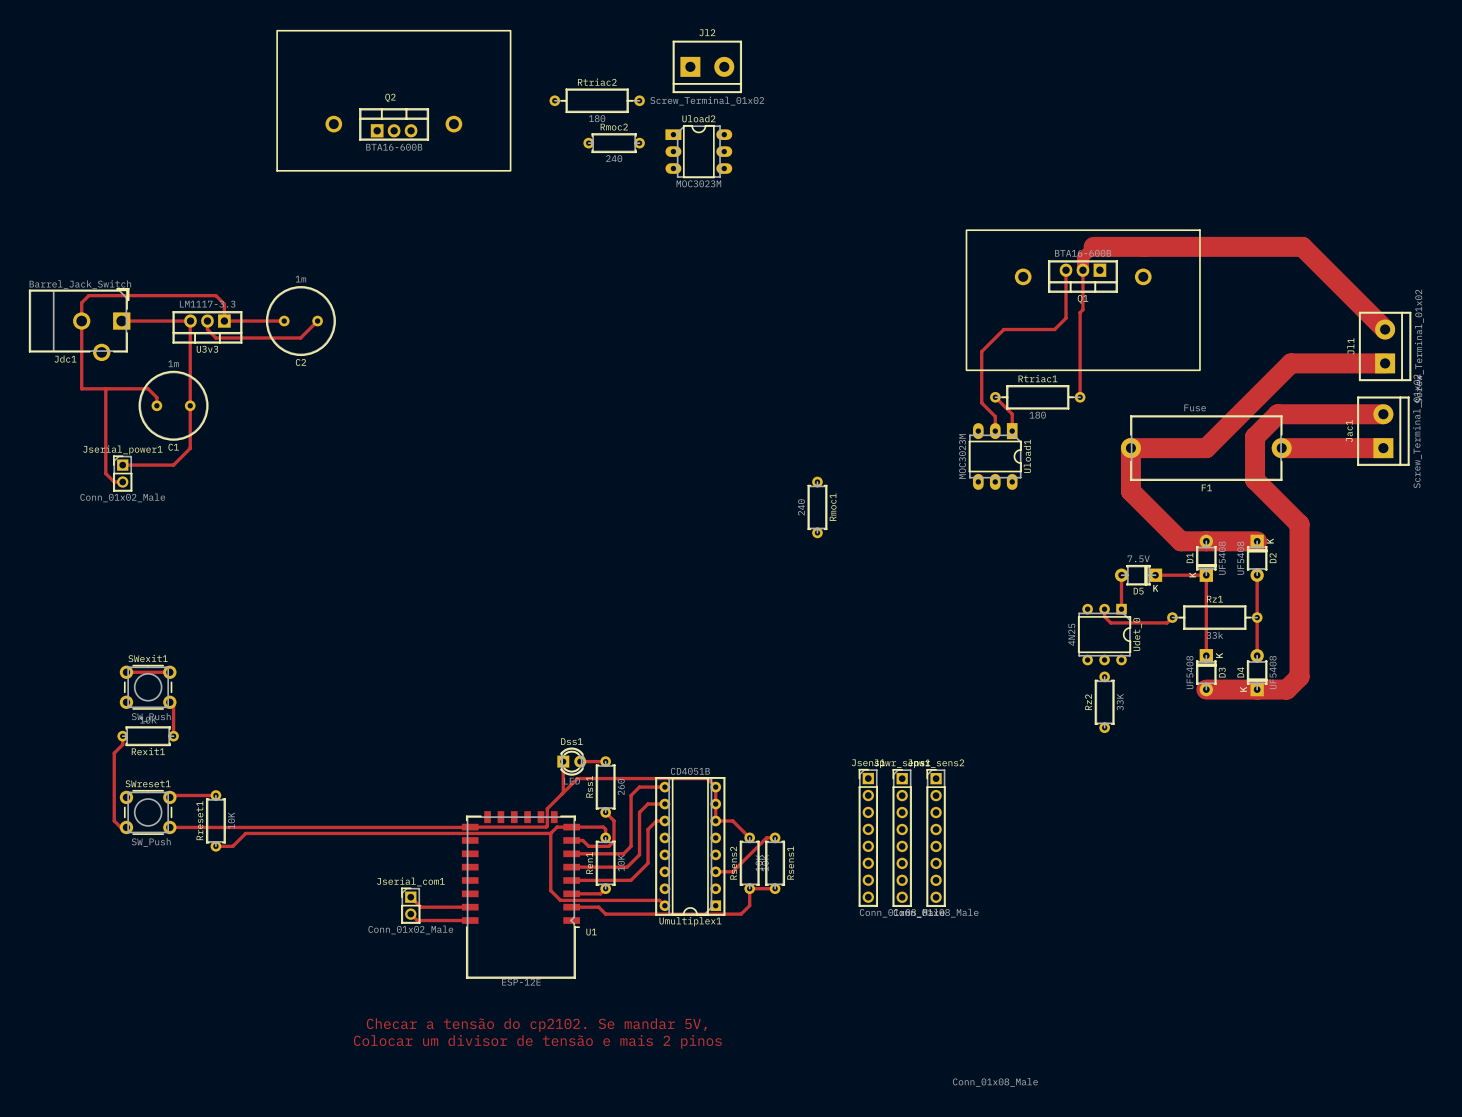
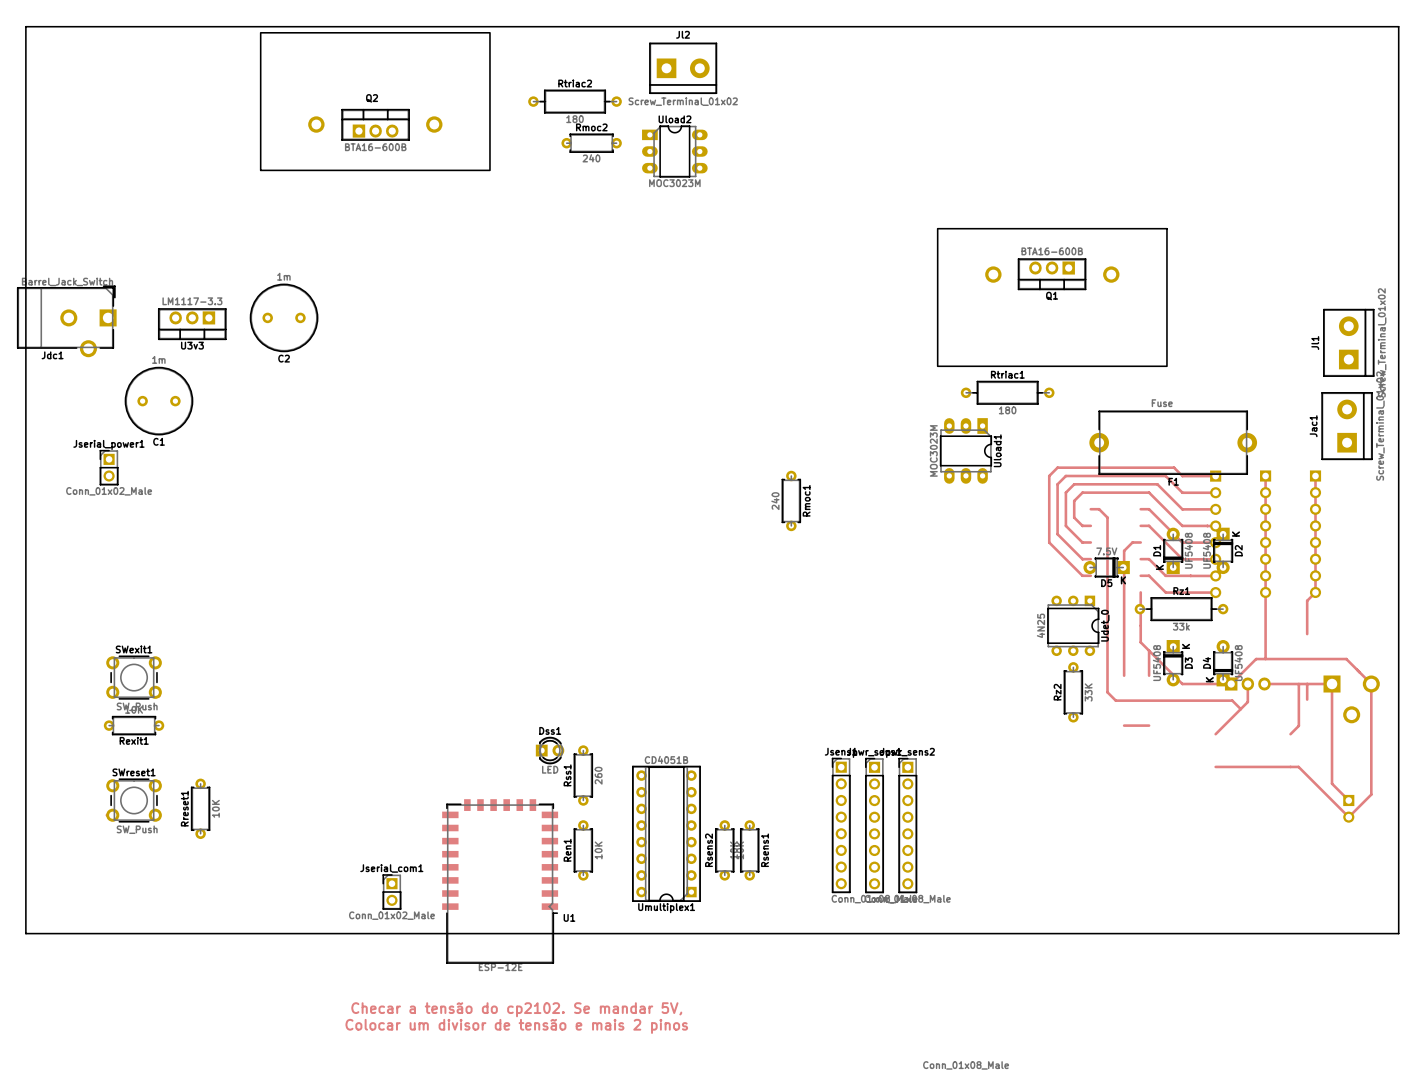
board edge: none -> (25, 26) (25, 933) (1398, 933) (1398, 26) (25, 26)
top track: (1066, 270) (1066, 318) (1054, 329) (1003, 329) (981, 351) (981, 402) (995, 416) (995, 431) -> none
top track: (121, 321) (190, 321) (190, 448) (173, 465) (122, 465) -> none
top track: (207, 321) (207, 329) (215, 337) (300, 337) (317, 321) -> none
top track: (284, 321) (224, 321) (224, 304) (215, 295) (88, 295) (81, 302) (81, 388) (148, 388) (156, 397) (156, 405) -> none
top track: (1385, 329) (1302, 246) (1093, 246) (1082, 257) (1082, 309) (1080, 312) (1080, 397) -> none
top track: (1385, 363) (1290, 363) (1206, 448) (1130, 448) (1130, 491) (1180, 541) (1257, 541) -> none
top track: (105, 388) (105, 473) (114, 482) (122, 482) -> none
top track: (995, 397) (1012, 414) (1012, 431) -> none
top track: (1383, 414) (1277, 414) (1255, 437) (1255, 479) (1299, 524) (1299, 676) (1286, 689) (1206, 689) -> none
top track: (1281, 448) (1383, 448) -> none
top track: none -> (1215, 476) (1182, 476) (1174, 467) (1057, 467) (1049, 476) (1049, 542) (1082, 575) (1090, 575)
top track: none -> (1265, 476) (1265, 659)
top track: none -> (1315, 476) (1315, 592) (1307, 600) (1307, 634)
top track: none -> (1215, 492) (1182, 492) (1165, 476) (1065, 476) (1057, 484) (1057, 534) (1082, 559)
top track: none -> (1090, 509) (1099, 509) (1107, 517) (1107, 692) (1115, 700) (1232, 700) (1240, 709)
top track: none -> (1140, 509) (1149, 509)
top track: none -> (1149, 509) (1182, 542) (1215, 542)
top track: none -> (1215, 509) (1182, 509) (1157, 484) (1074, 484) (1065, 492) (1065, 525) (1082, 542)
top track: none -> (1082, 525) (1090, 525)
top track: none -> (1082, 525) (1074, 517) (1074, 500) (1082, 492) (1149, 492) (1182, 525) (1215, 526)
top track: none -> (1140, 525) (1149, 525) (1182, 559) (1215, 559)
part: none -> (1215, 534)
part: none -> (1265, 534)
part: none -> (1315, 534)
top track: none -> (1082, 542) (1090, 542)
top track: none -> (1140, 542) (1132, 542) (1124, 550) (1124, 675)
top track: none -> (1082, 559) (1090, 559)
top track: none -> (1140, 559) (1149, 559)
top track: none -> (1149, 559) (1165, 575) (1215, 575)
top track: (1121, 575) (1121, 609) -> none
top track: (1155, 575) (1206, 575) (1206, 655) -> none
top track: (1257, 575) (1257, 655) -> none
top track: none -> (1140, 575) (1149, 575) (1165, 592) (1215, 592)
top track: none -> (1140, 592) (1140, 642) (1182, 684) (1231, 684) (1256, 659) (1346, 659) (1371, 684) (1371, 794) (1348, 817) (1298, 766) (1215, 766)
top track: (1104, 609) (1104, 616) (1110, 622) (1167, 622) (1172, 617) -> none
top track: none -> (1149, 650) (1149, 675)
top track: (130, 672) (173, 672) -> none
top track: none -> (1247, 684) (1247, 702) (1215, 734)
part: none -> (1247, 684)
top track: none -> (1264, 684) (1332, 684)
top track: none -> (1298, 684) (1298, 725) (1290, 734)
top track: none -> (1307, 684) (1307, 699)
top track: none -> (1332, 684) (1332, 783) (1348, 800)
top track: (173, 706) (173, 736) -> none
part: none -> (1351, 699)
top track: (122, 736) (122, 744) (114, 753) (114, 820) (120, 827) -> none
top track: none -> (1124, 725) (1149, 725)
top track: (563, 761) (563, 792) -> none
top track: (580, 761) (605, 761) -> none
top track: (664, 787) (639, 787) (631, 795) (631, 846) (623, 853) (571, 853) -> none
top track: (171, 795) (215, 795) -> none
top track: (664, 804) (647, 804) (639, 812) (639, 854) (627, 867) (571, 867) -> none
top track: (605, 812) (613, 820) (613, 841) (608, 846) (588, 846) (582, 840) (571, 840) -> none
top track: (664, 820) (656, 820) (648, 829) (648, 863) (630, 880) (571, 880) -> none
part: none -> (1348, 808)
top track: (169, 827) (469, 827) -> none
top track: (470, 827) (546, 827) (547, 808) (577, 778) (707, 778) (715, 787) (715, 820) (732, 820) (749, 837) -> none
top track: (550, 833) (557, 827) (603, 827) (605, 829) (605, 837) -> none
top track: (550, 833) (550, 890) (560, 900) (659, 900) (664, 905) -> none
top track: (550, 833) (245, 833) (232, 846) (215, 846) -> none
top track: (775, 837) (766, 837) (732, 871) (715, 871) -> none
top track: (605, 888) (600, 893) (571, 893) -> none
top track: (775, 888) (749, 888) (749, 905) (741, 914) (605, 914) (598, 907) (571, 907) -> none
top track: (410, 897) (420, 907) (470, 907) -> none
top track: (410, 914) (417, 920) (470, 920) -> none

